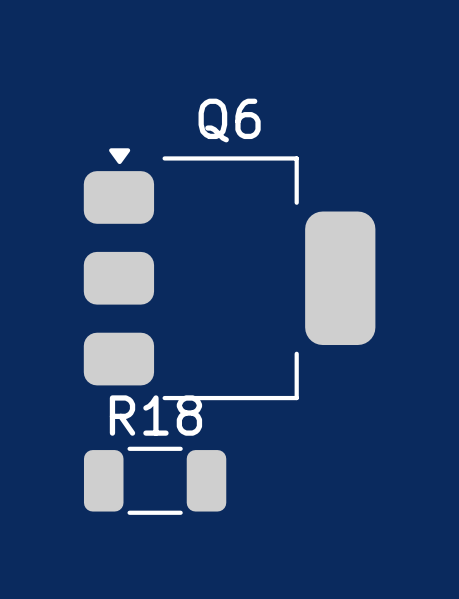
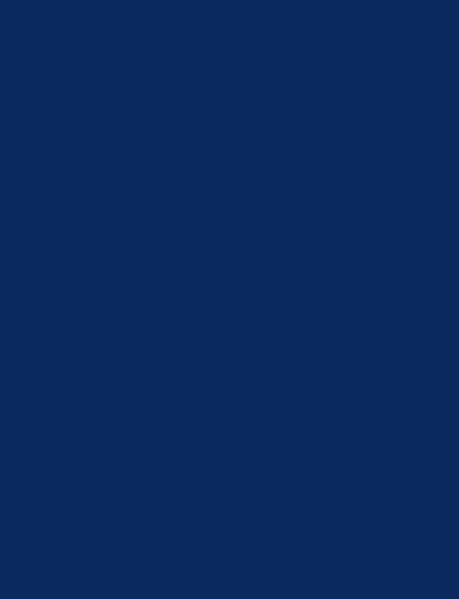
Q6: (229, 274) -> none
R18: (155, 480) -> none

